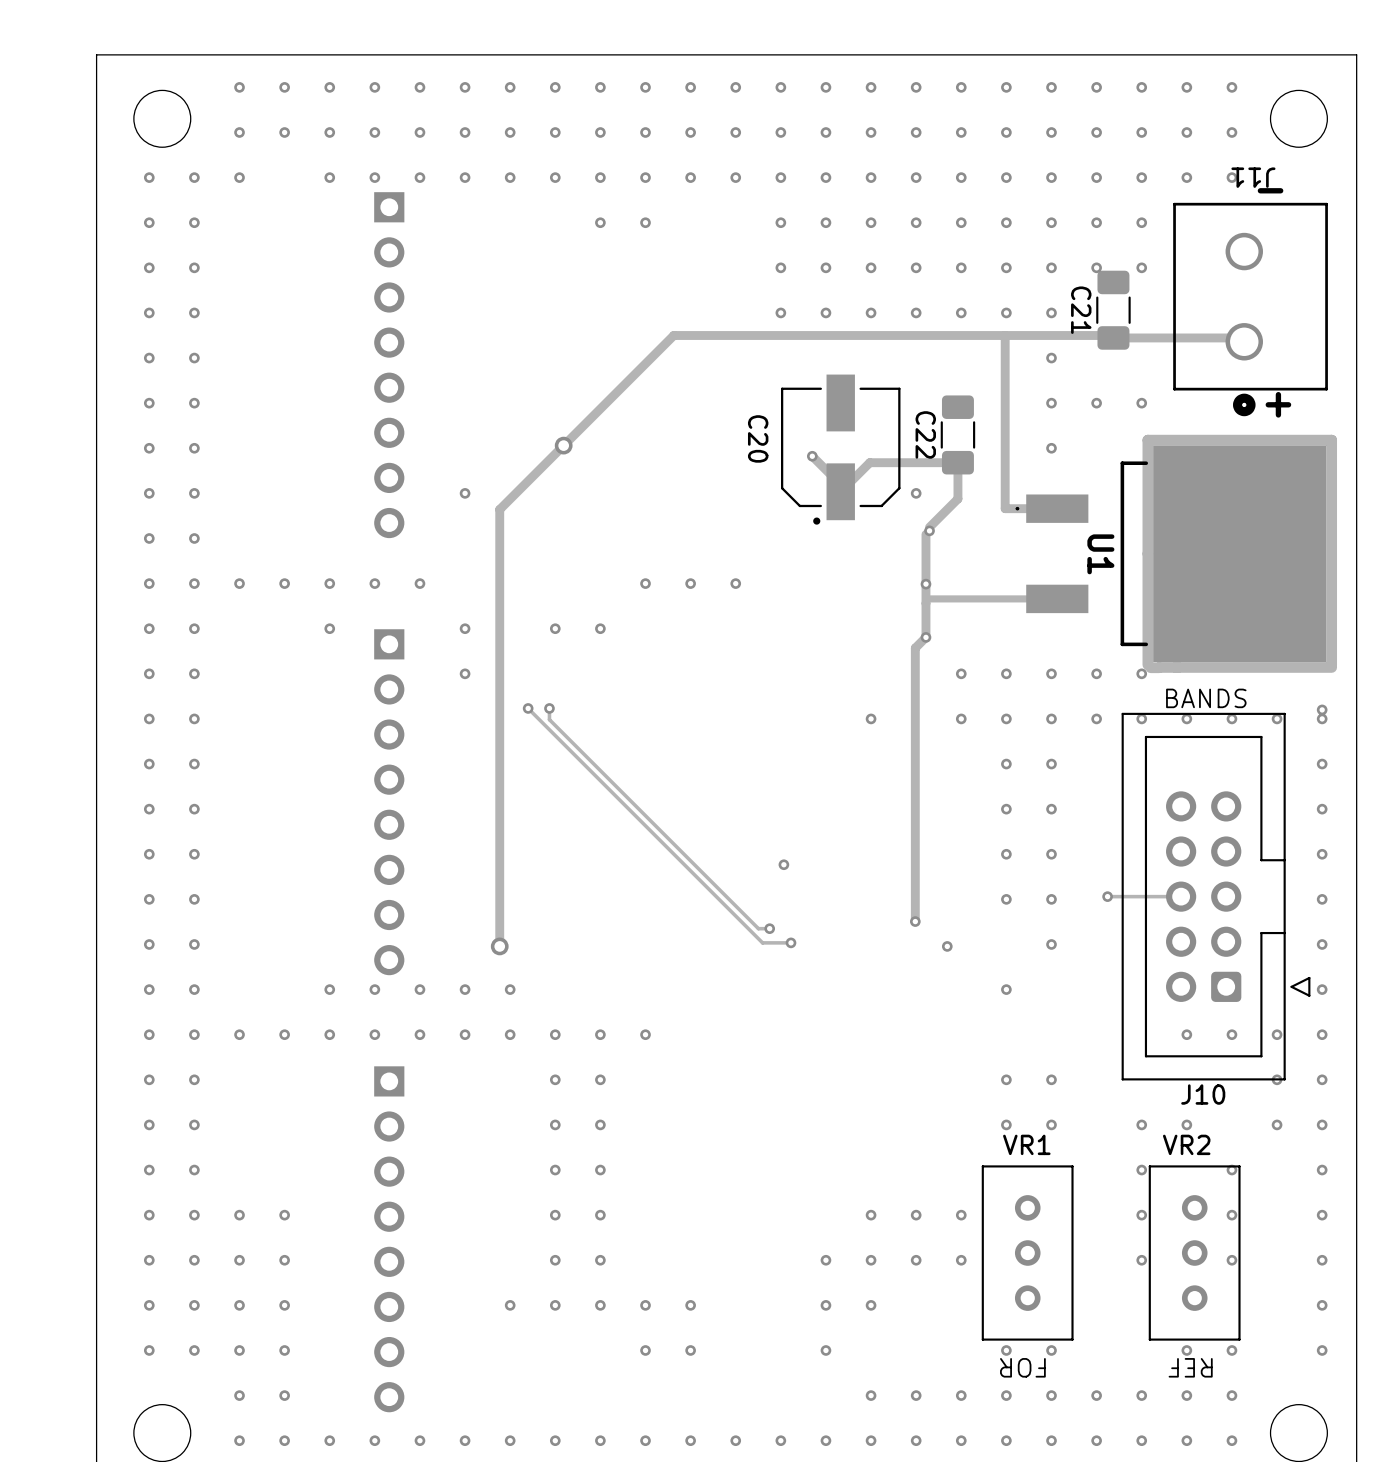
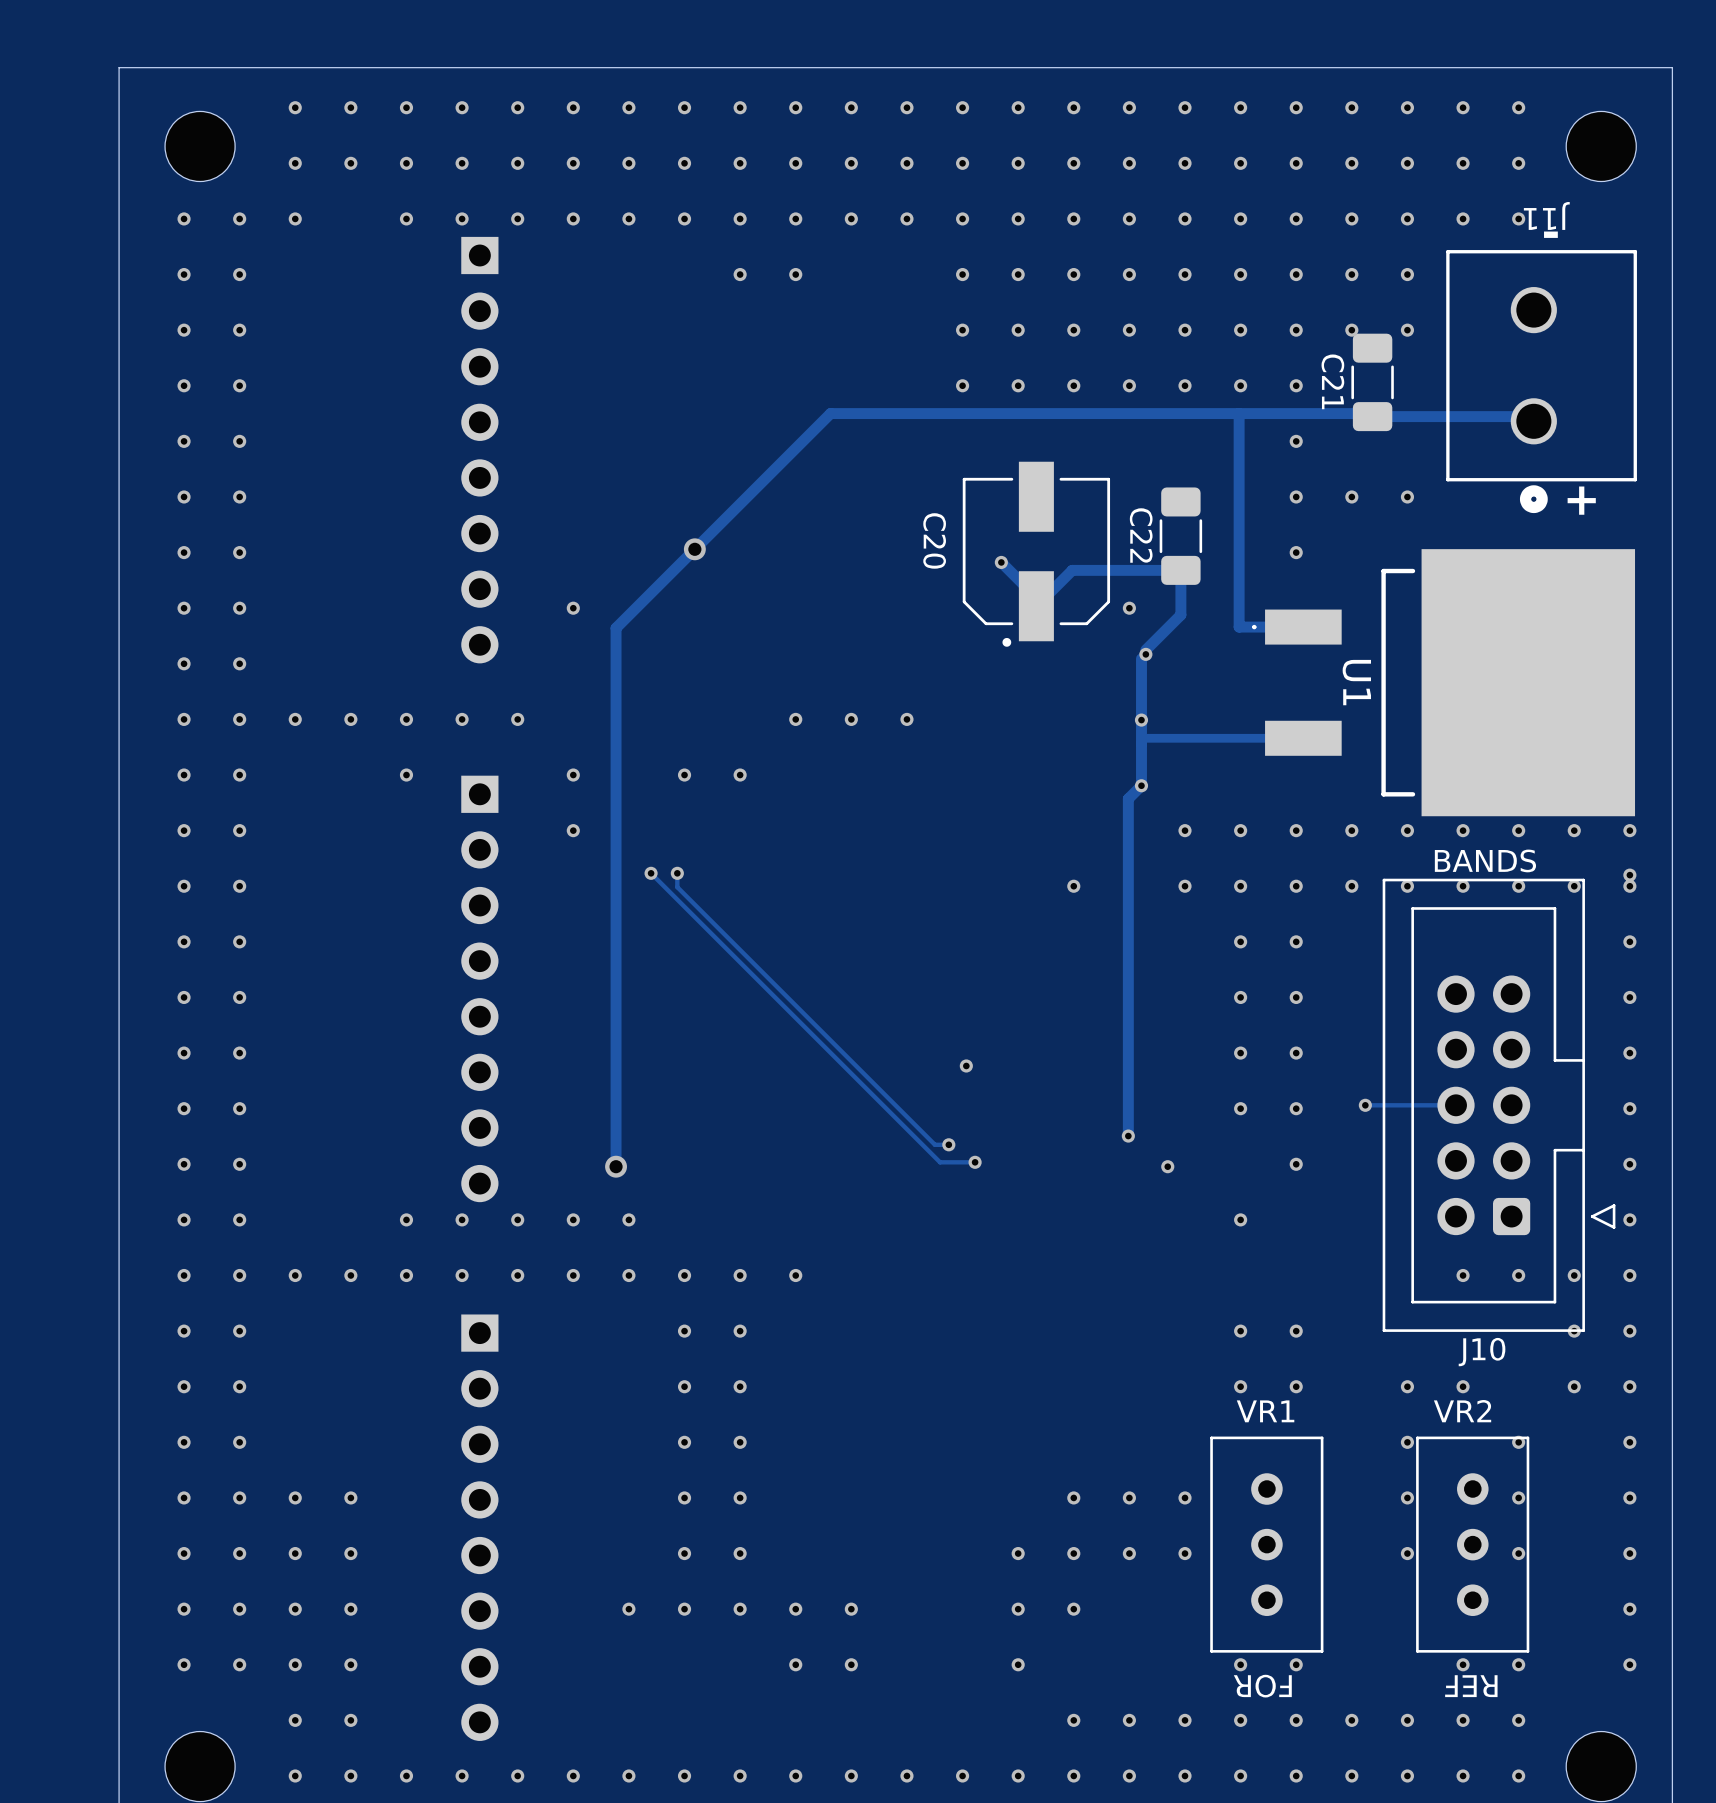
track: (1331, 440) (1147, 440) (1147, 664) (1150, 667) (1331, 667) (1331, 440) -> none
via: none -> (1463, 830)
via: none -> (1518, 830)
via: none -> (1574, 830)
via: none -> (1629, 830)

